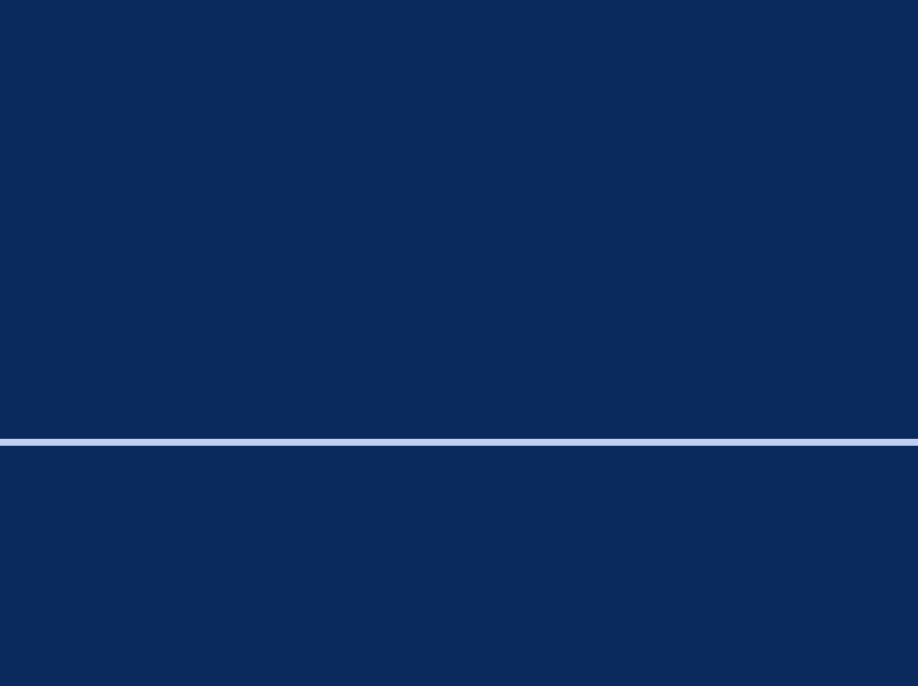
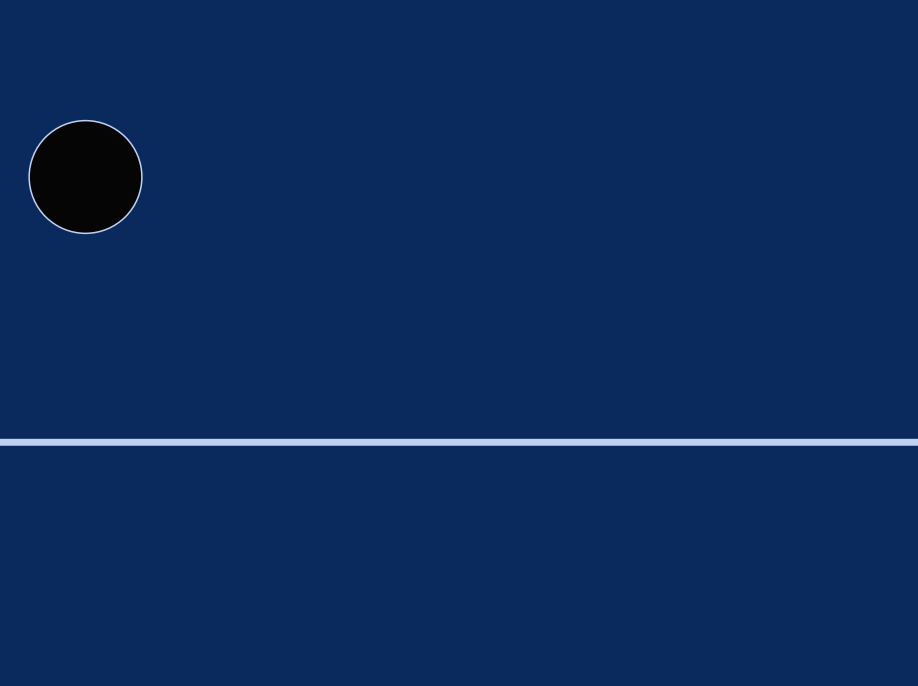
part: none -> (85, 176)

